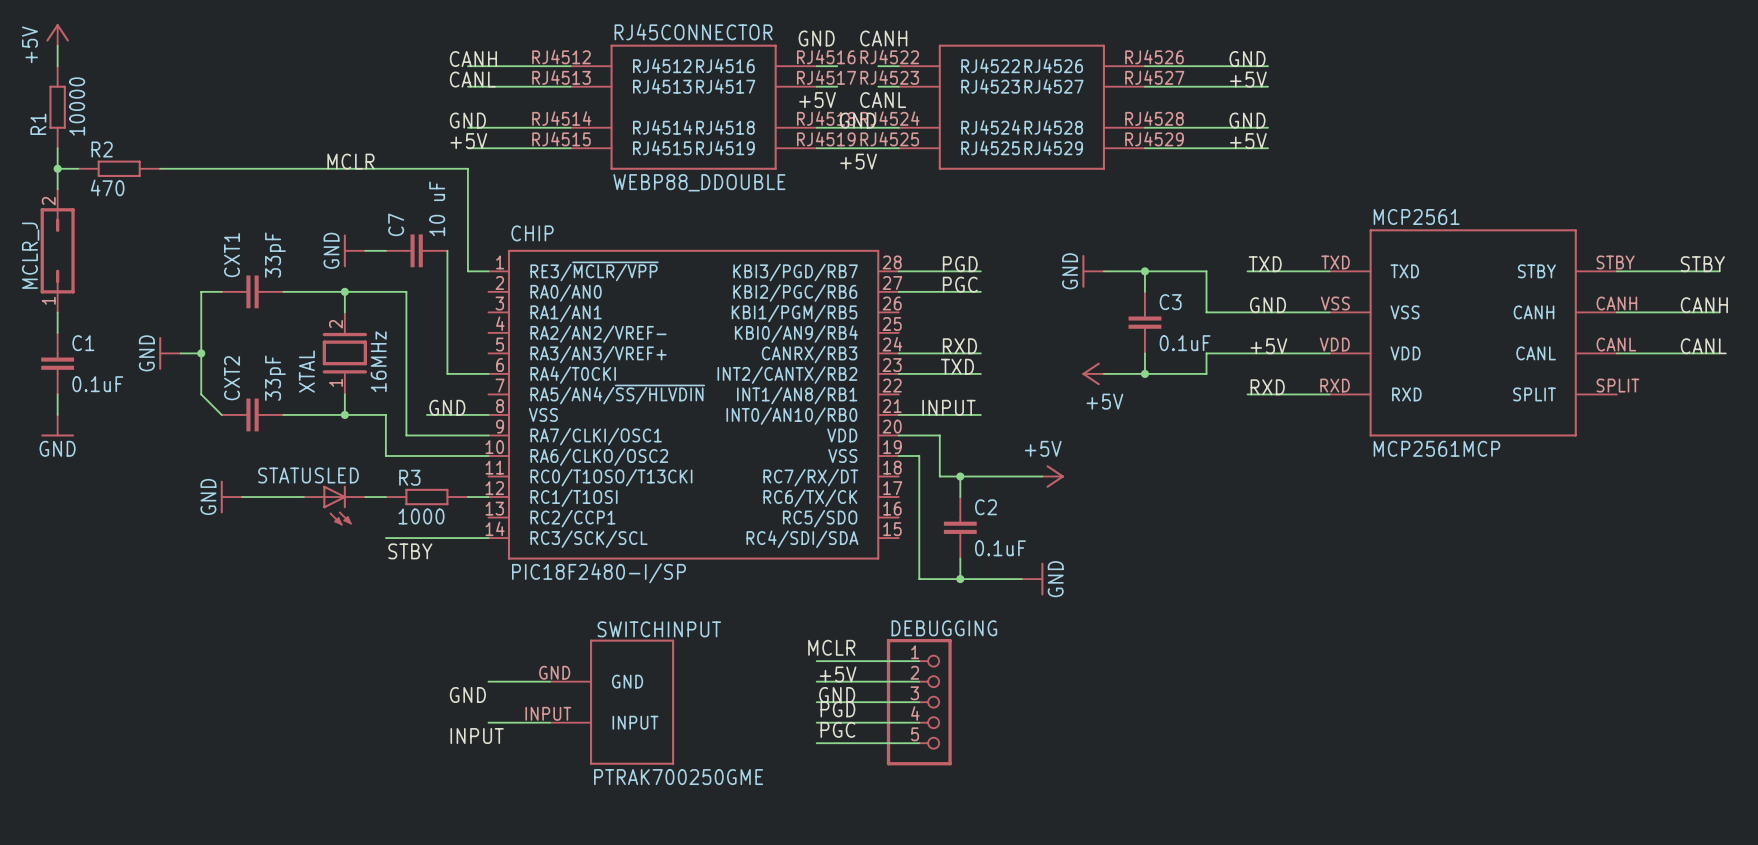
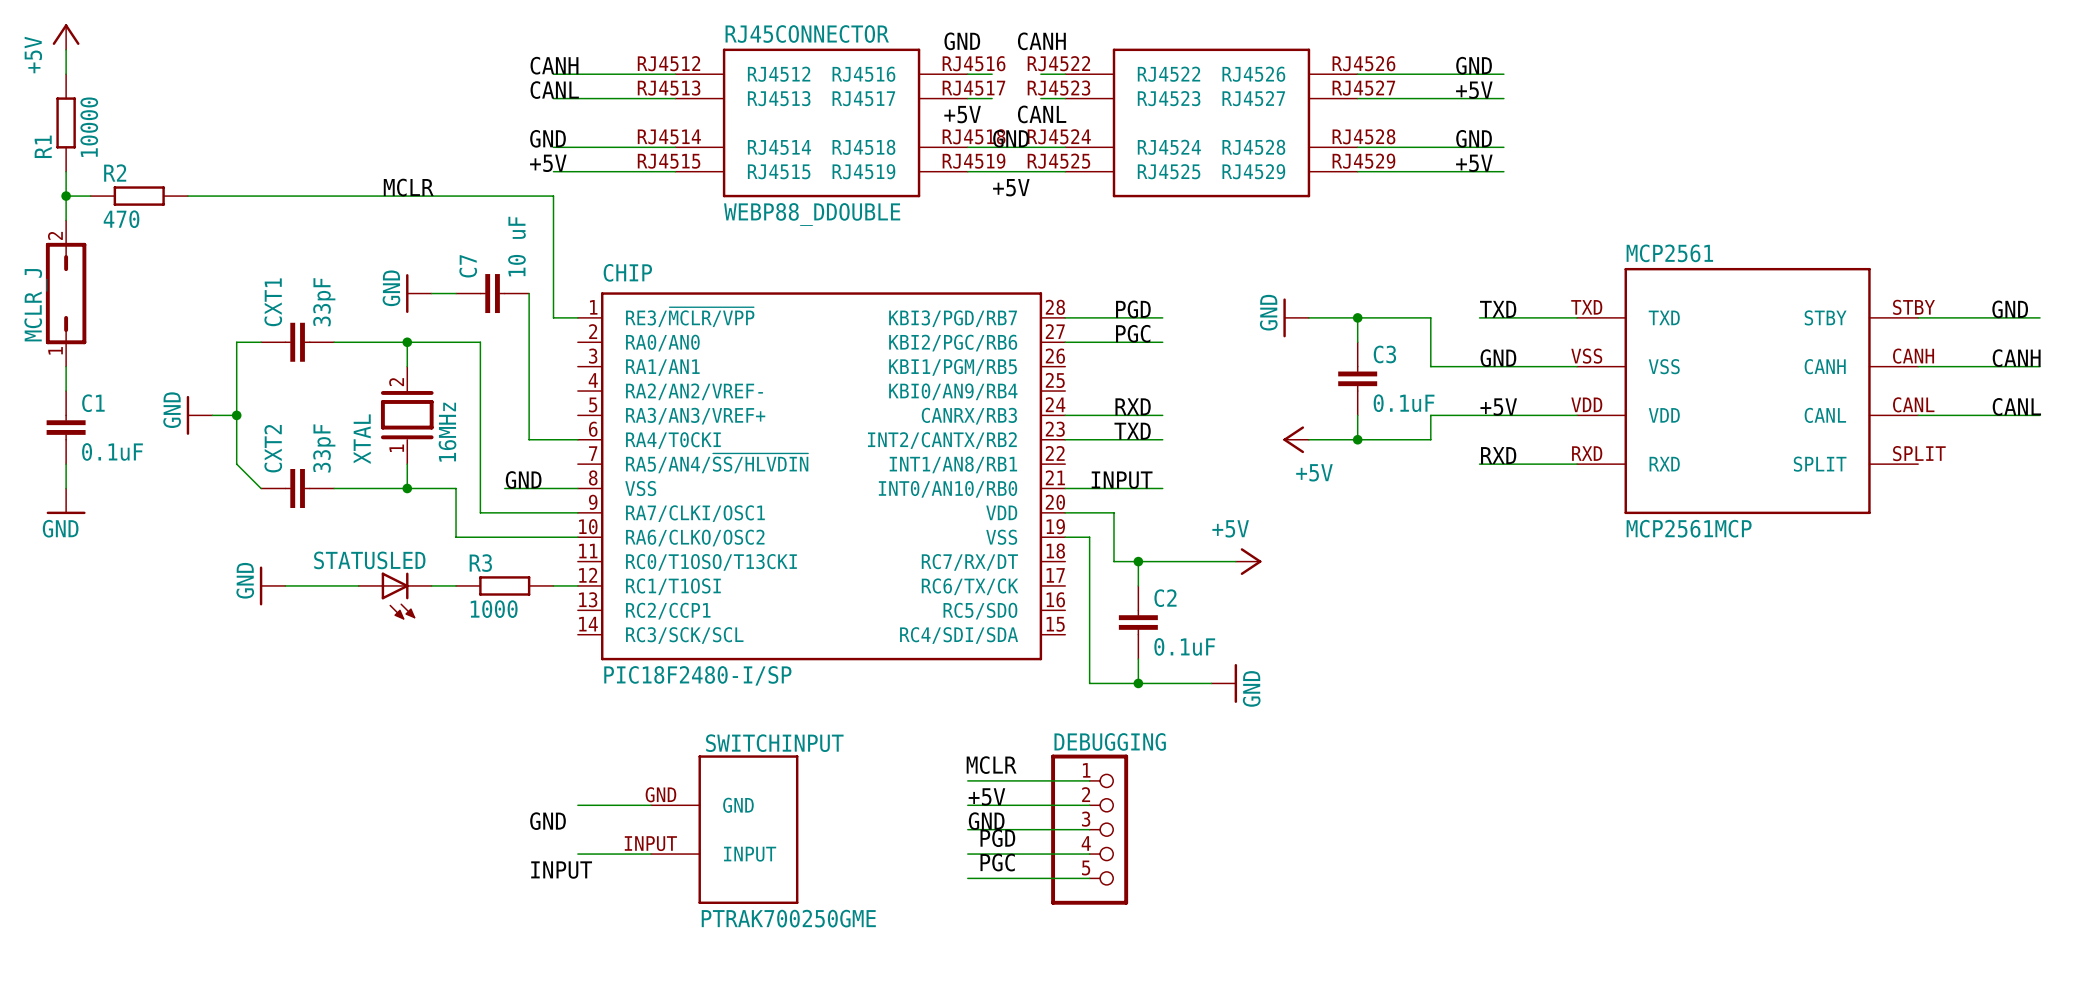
label: STBY (1702, 264) -> GND (2010, 309)
wire: (385, 538) (488, 538) -> none
label: STBY (410, 551) -> none

